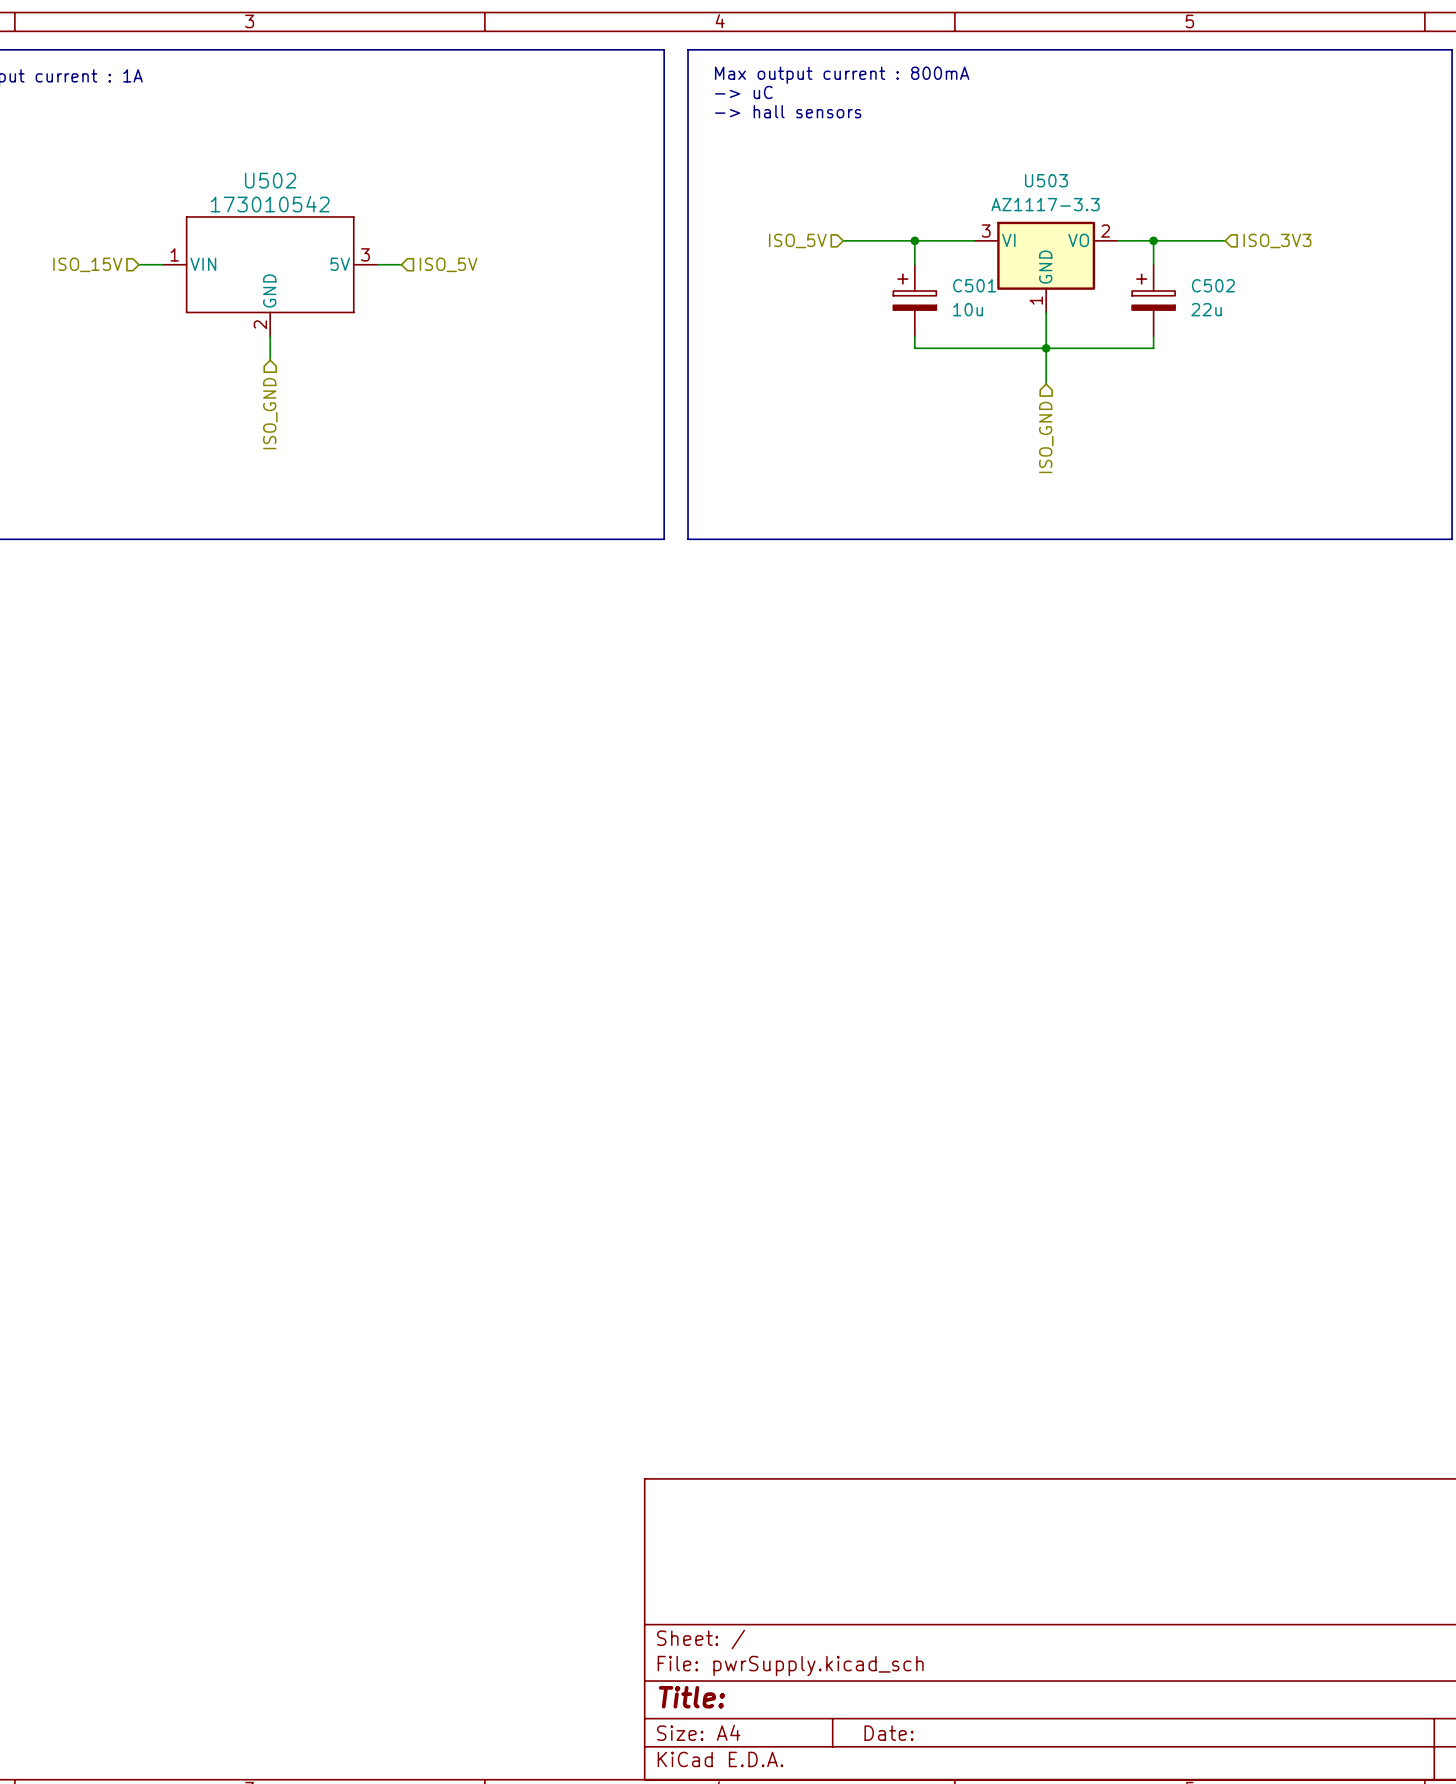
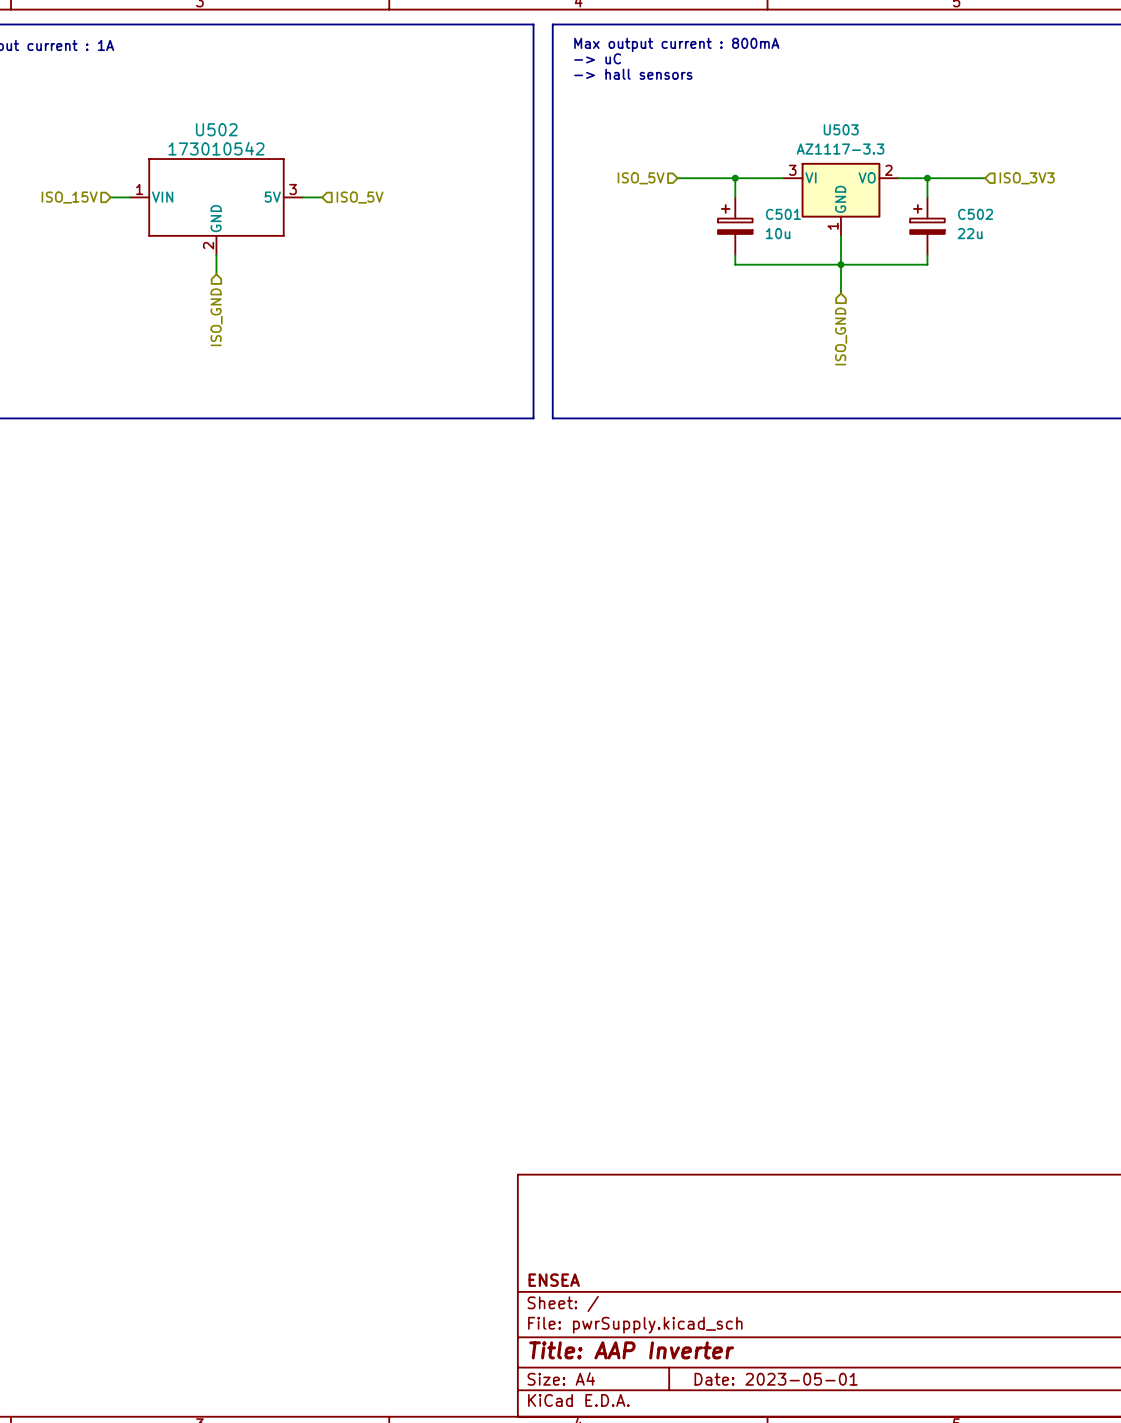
title block: none -> ENSEA (554, 1280)
title block: Title: (691, 1697) -> Title: AAP Inverter (631, 1350)
title block: Date: (889, 1733) -> Date: 2023-05-01 (776, 1379)

